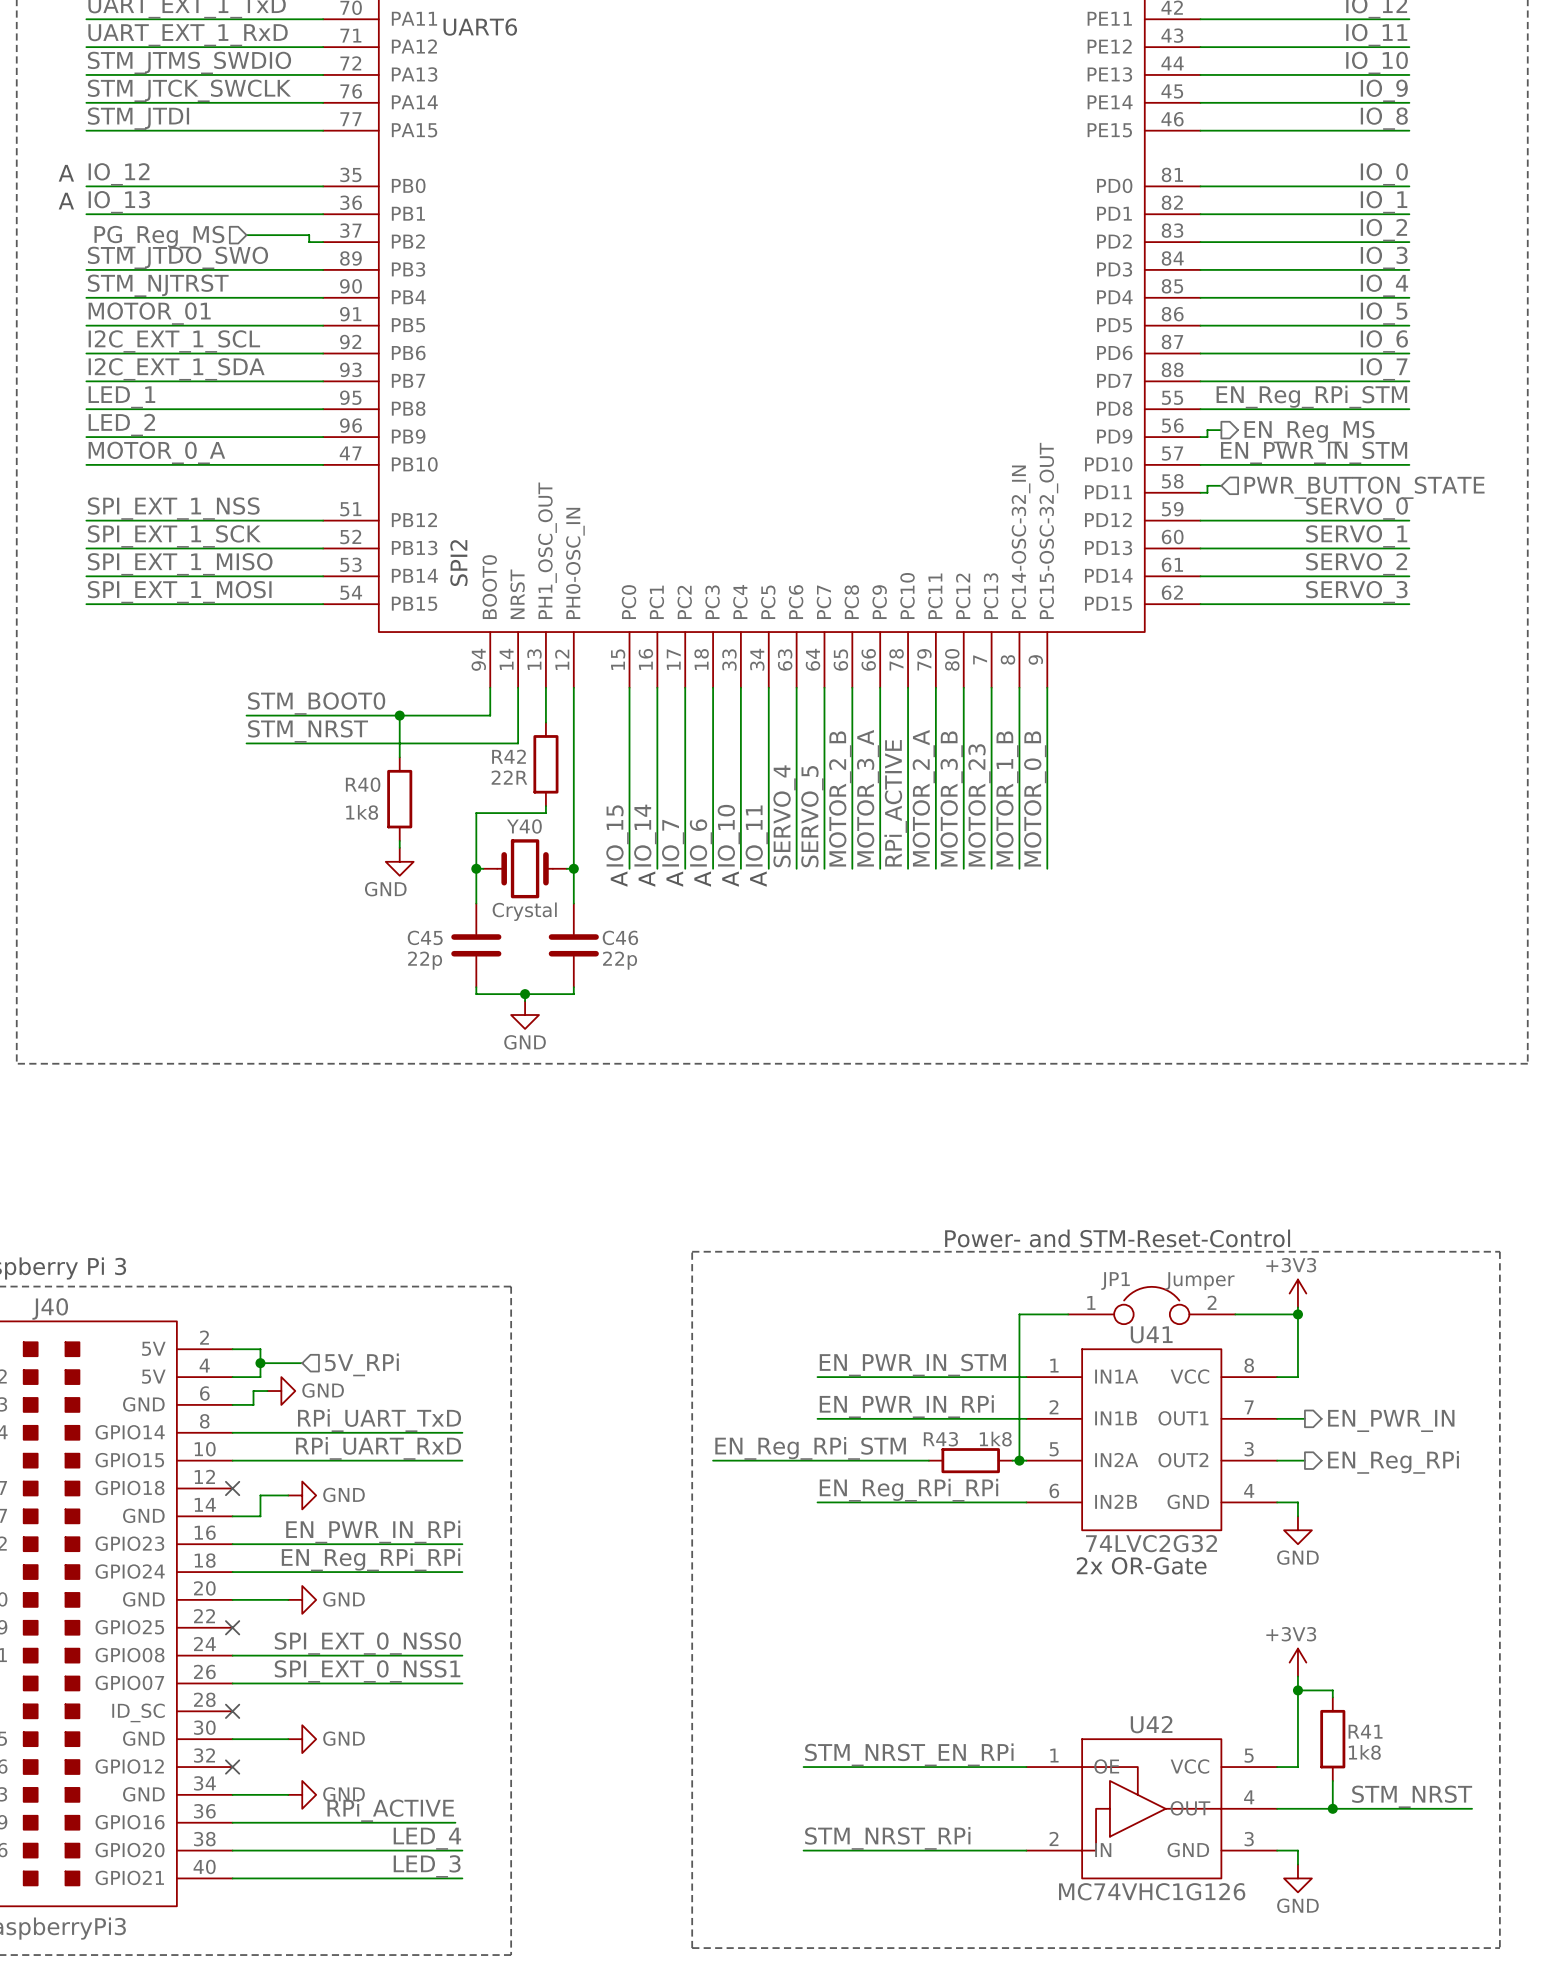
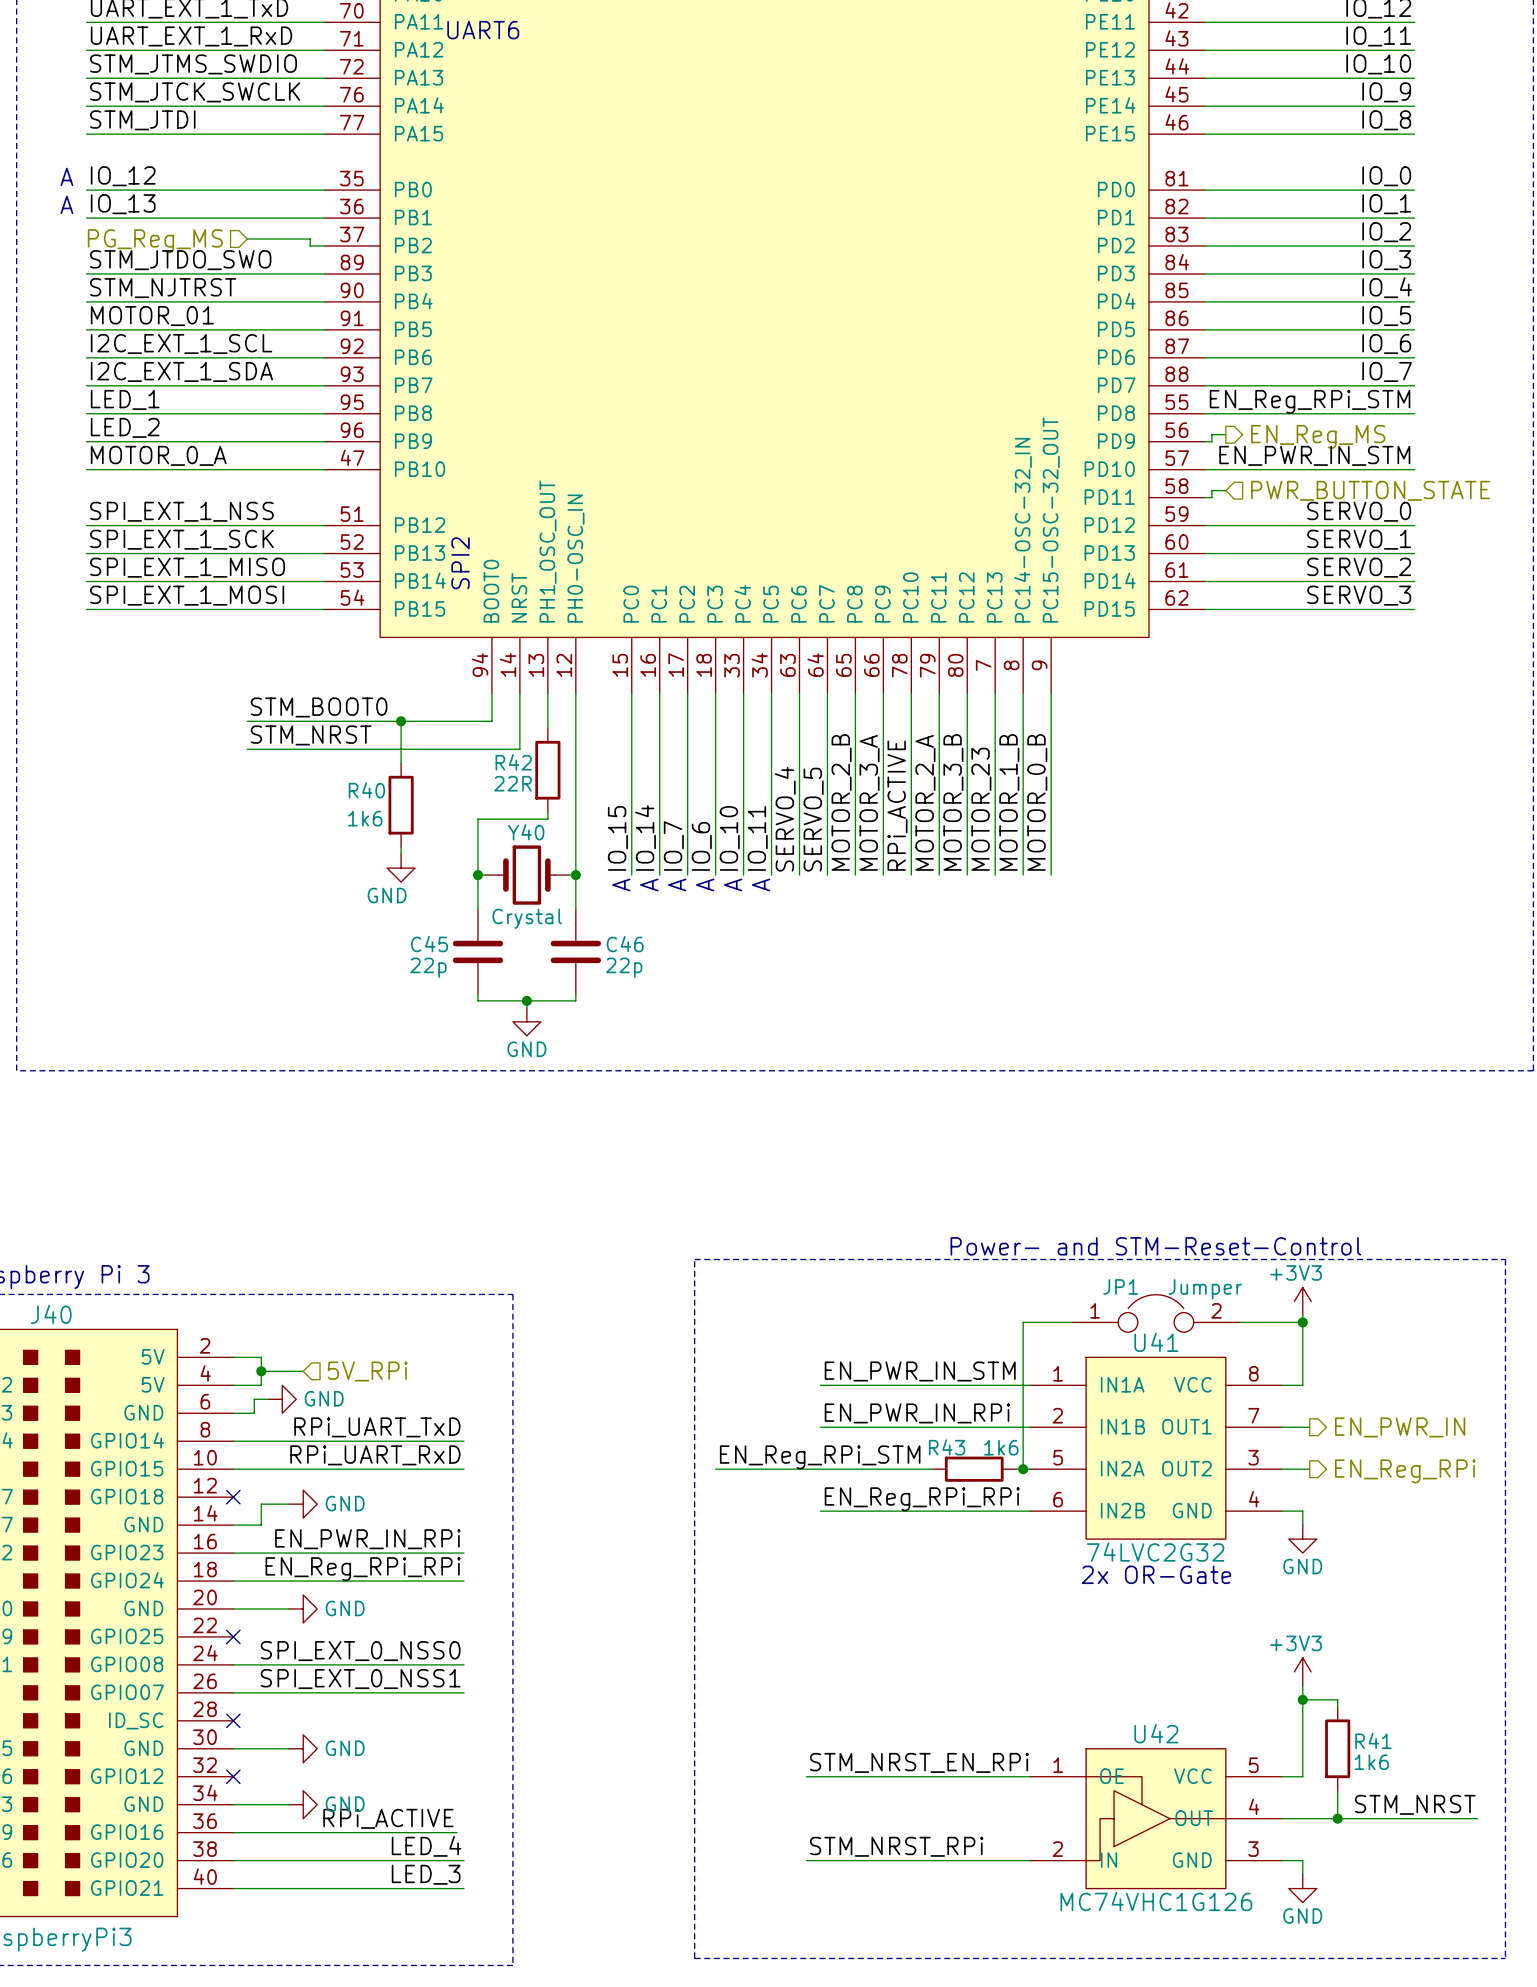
R40 value: 1k8 (362, 812) -> 1k6 (365, 818)
R43 value: 1k8 (995, 1439) -> 1k6 (1001, 1447)
R41 value: 1k8 (1364, 1752) -> 1k6 (1371, 1762)

